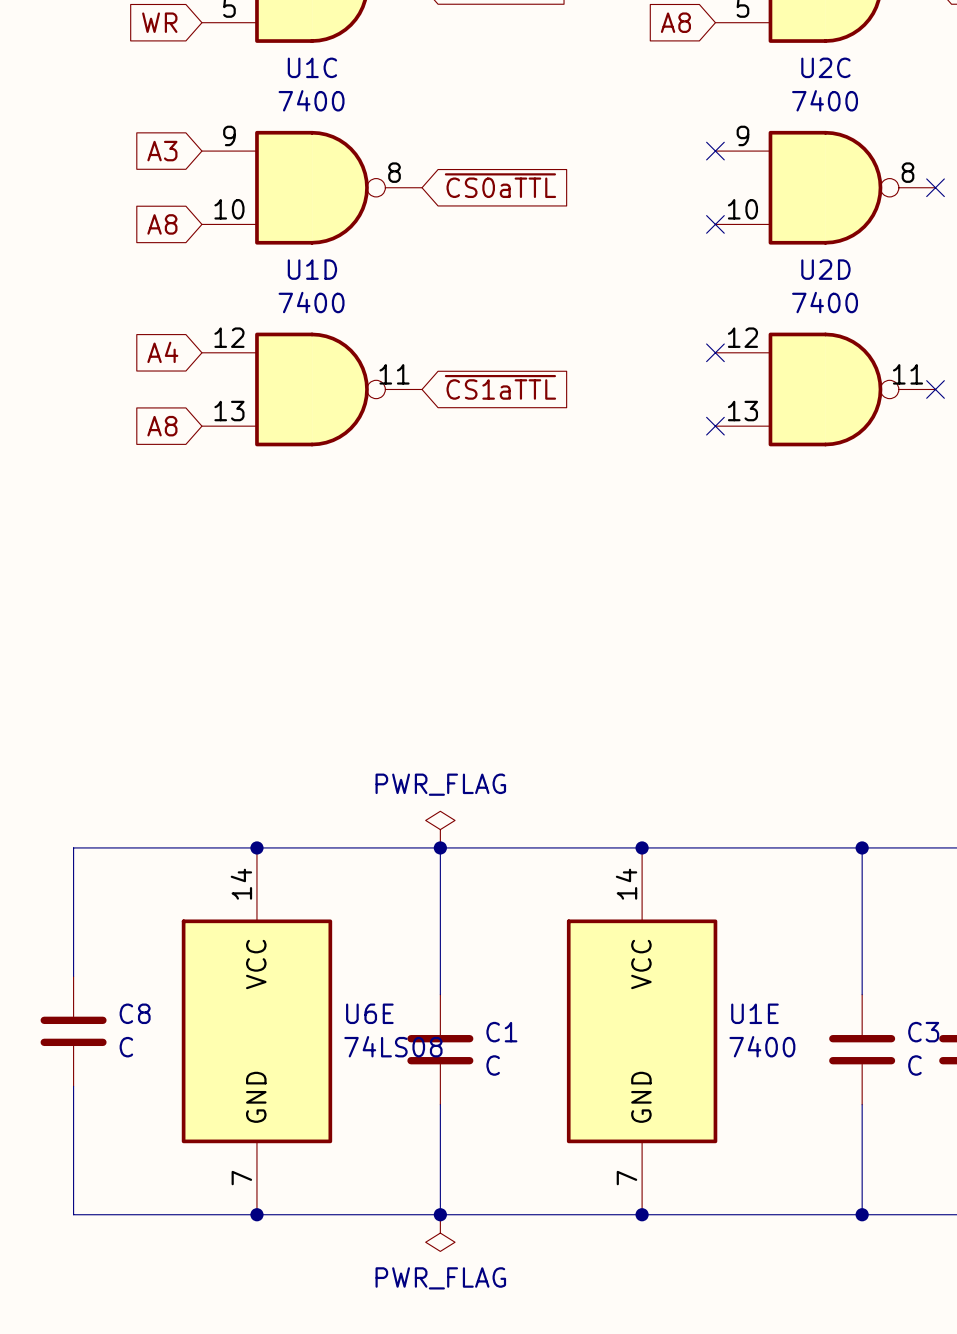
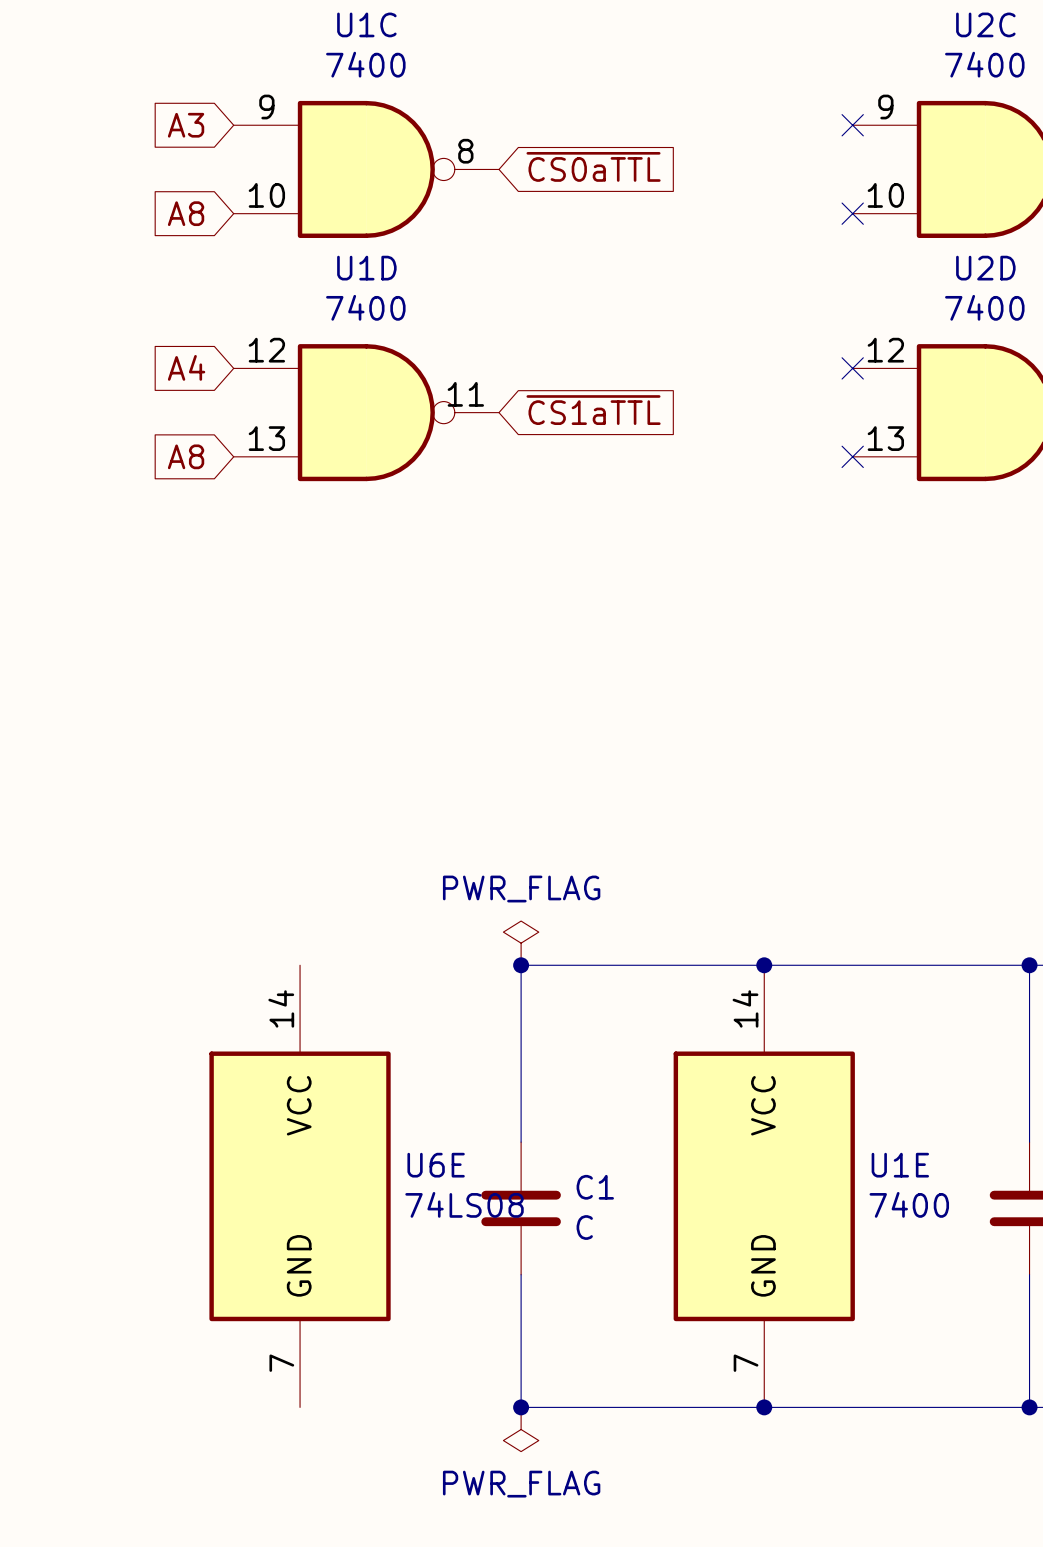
junction: (256, 847) -> none
wire: (440, 847) (73, 847) (73, 976) -> none
C8: C (73, 1031) -> none
wire: (73, 1086) (73, 1214) (440, 1214) -> none
junction: (256, 1214) -> none

